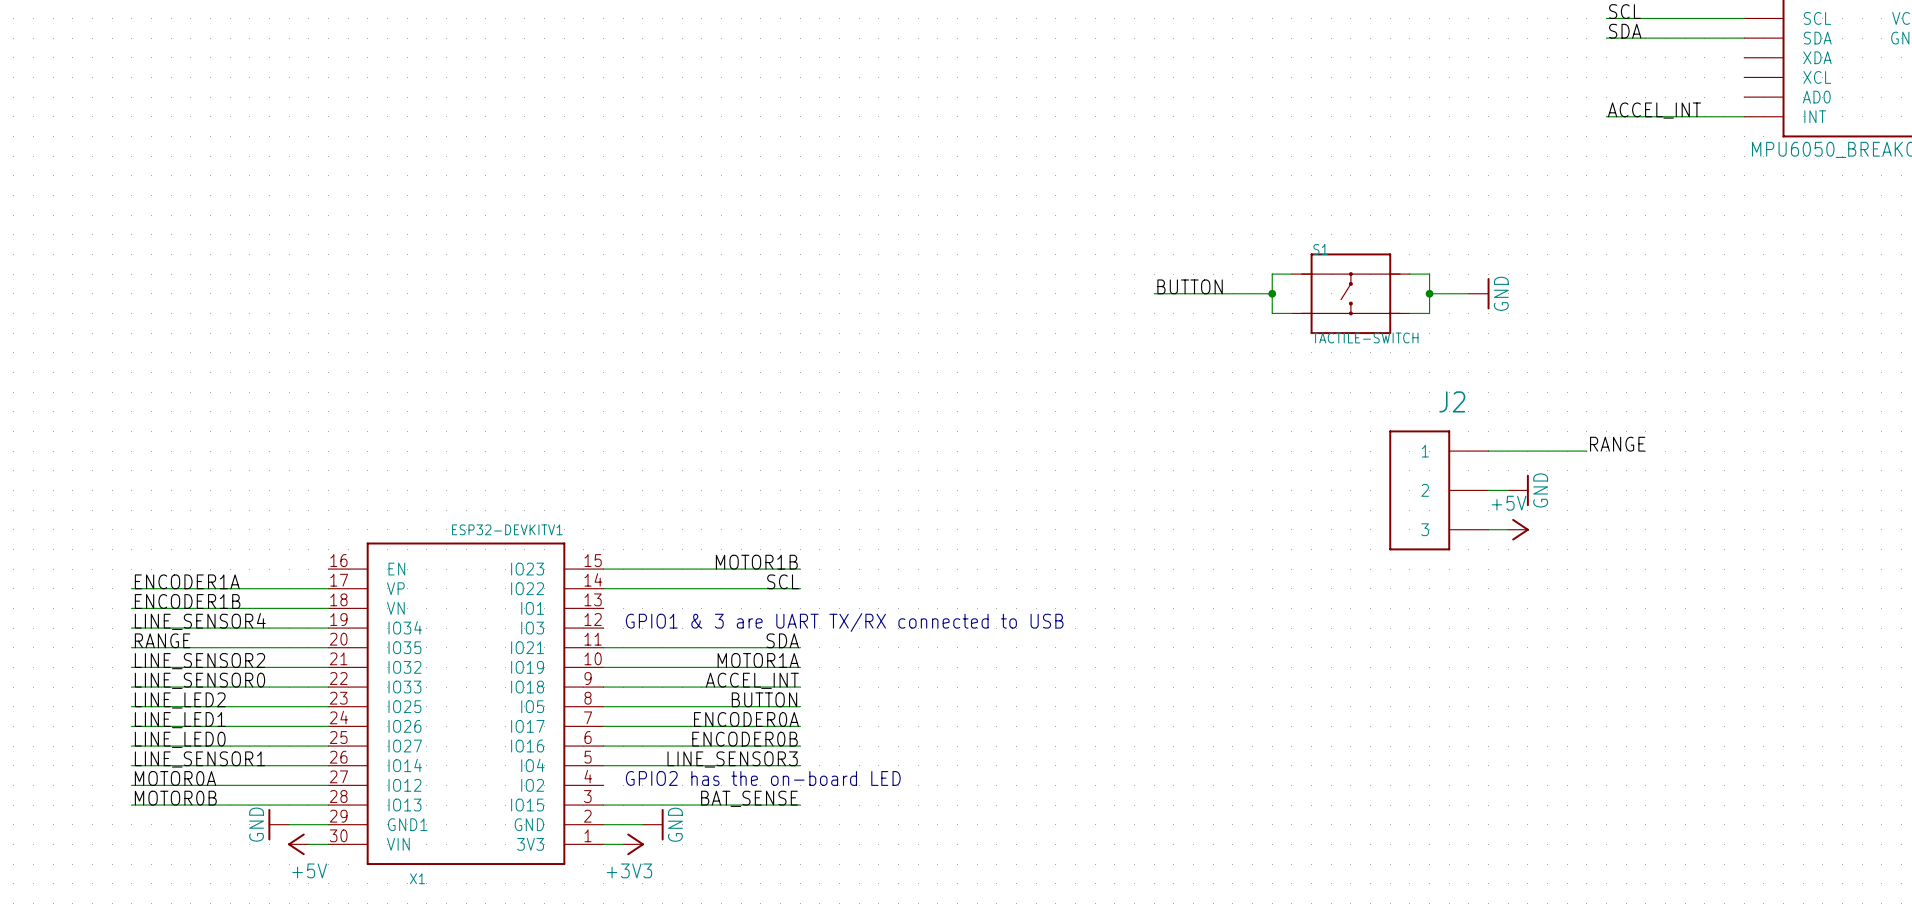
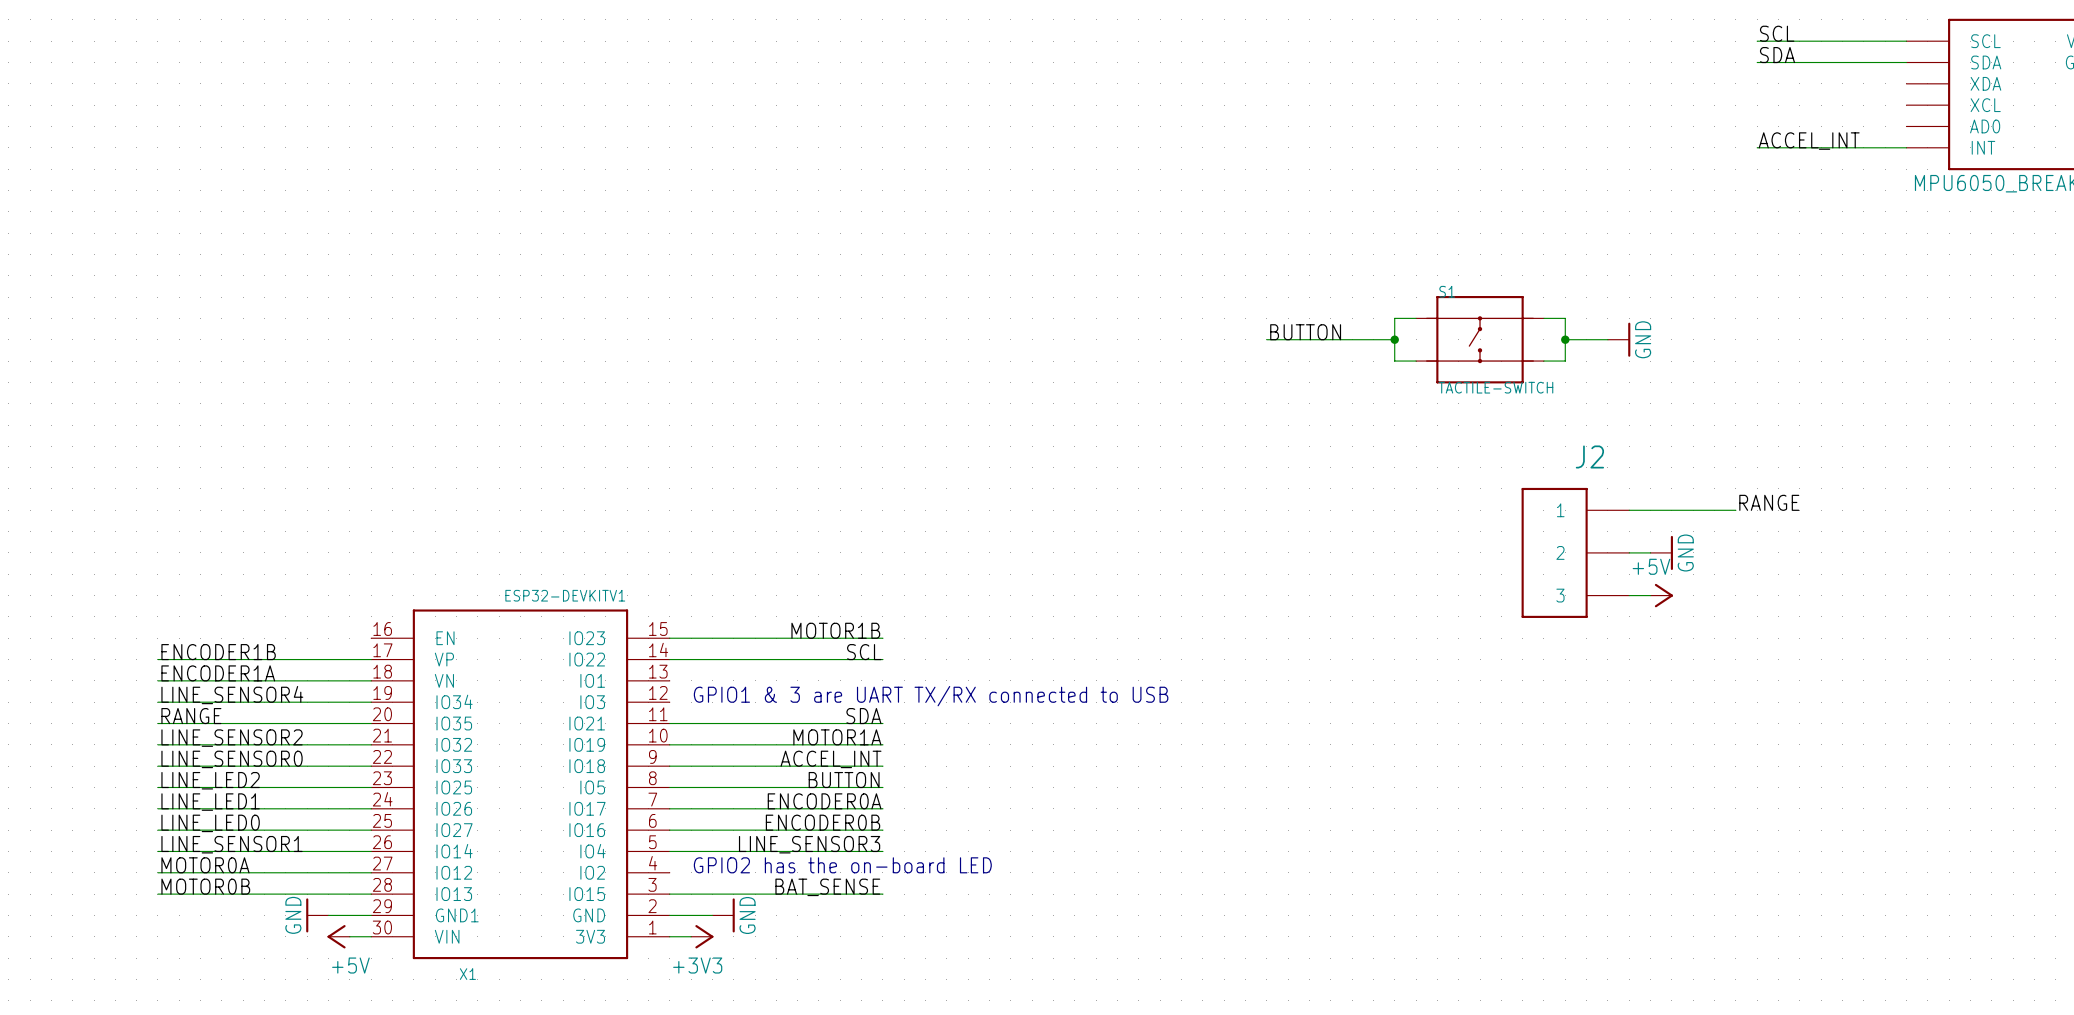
label: ENCODER1A (187, 581) -> ENCODER1B (218, 652)
label: ENCODER1B (187, 601) -> ENCODER1A (218, 673)

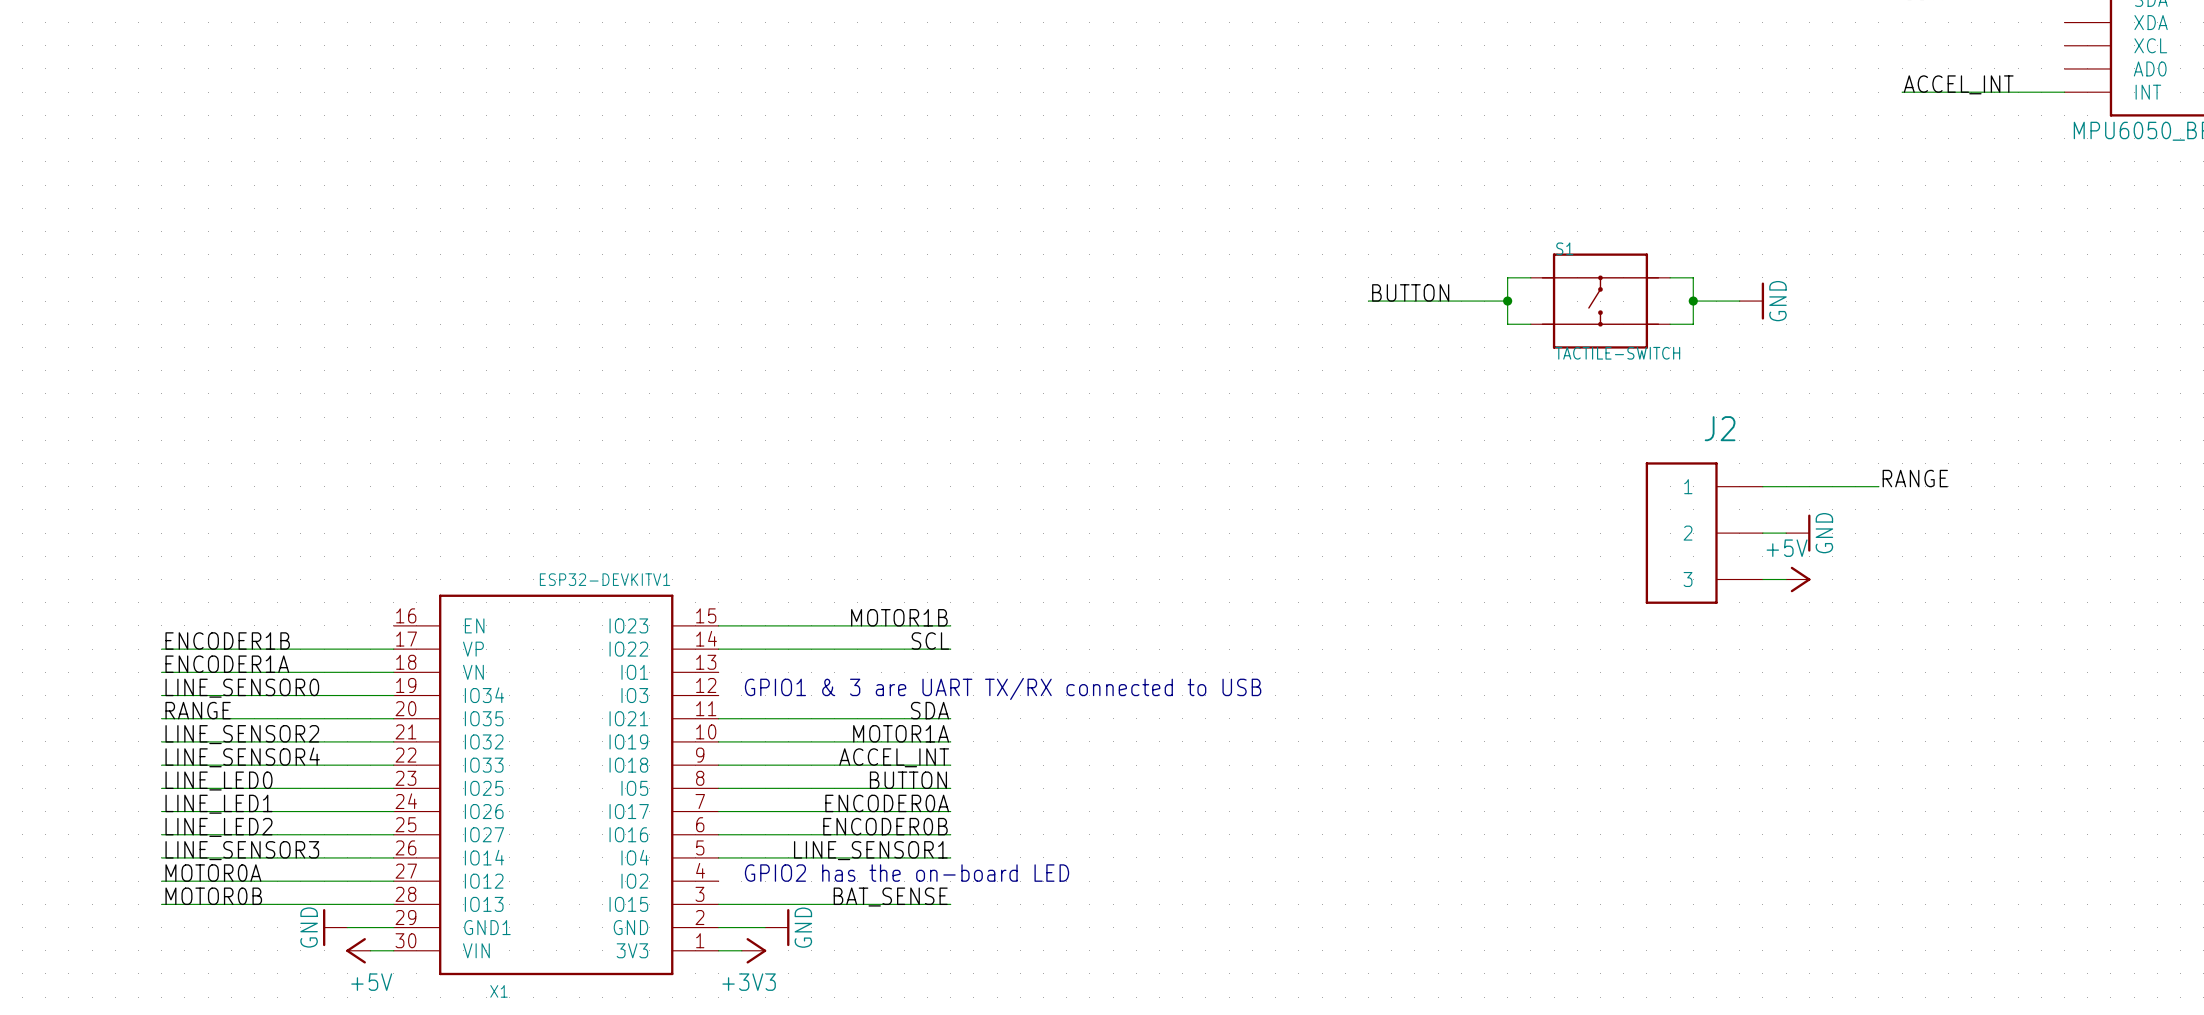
label: LINE_SENSOR4 (232, 695) -> LINE_SENSOR0 (242, 688)
label: LINE_SENSOR0 (232, 759) -> LINE_SENSOR4 (242, 757)
label: LINE_LED2 (210, 780) -> LINE_LED0 (218, 781)
label: LINE_LED0 (210, 823) -> LINE_LED2 (218, 827)
label: LINE_SENSOR1 (232, 844) -> LINE_SENSOR3 (242, 850)
label: LINE_SENSOR3 (809, 844) -> LINE_SENSOR1 (870, 850)

